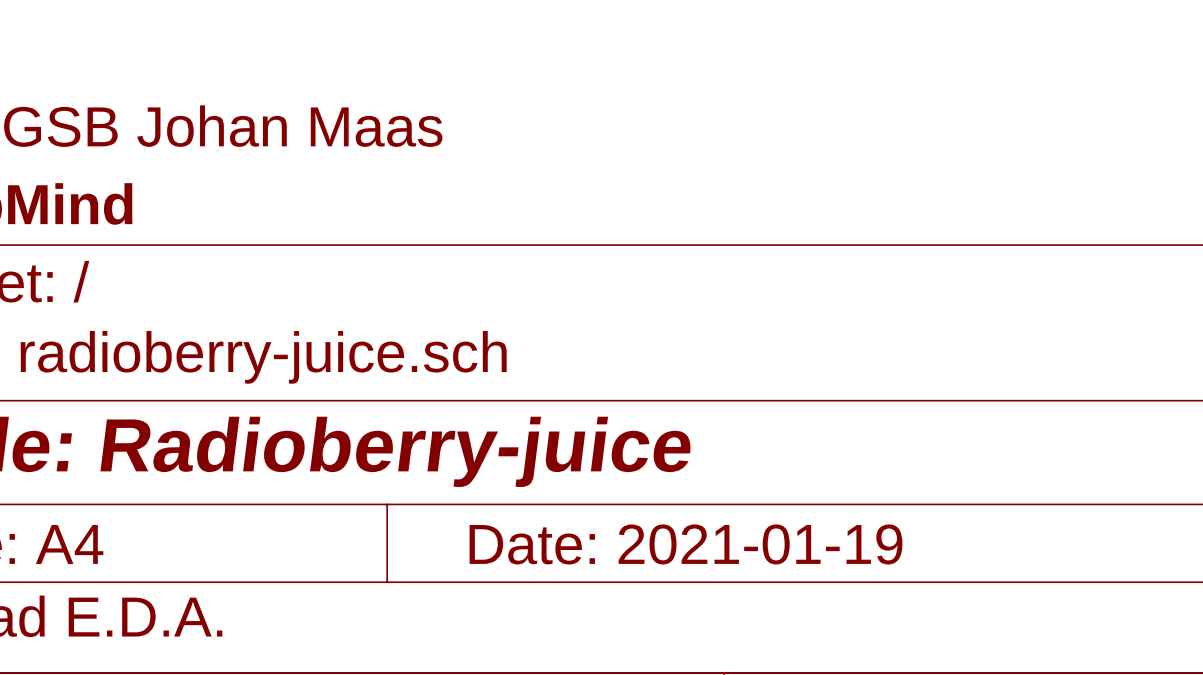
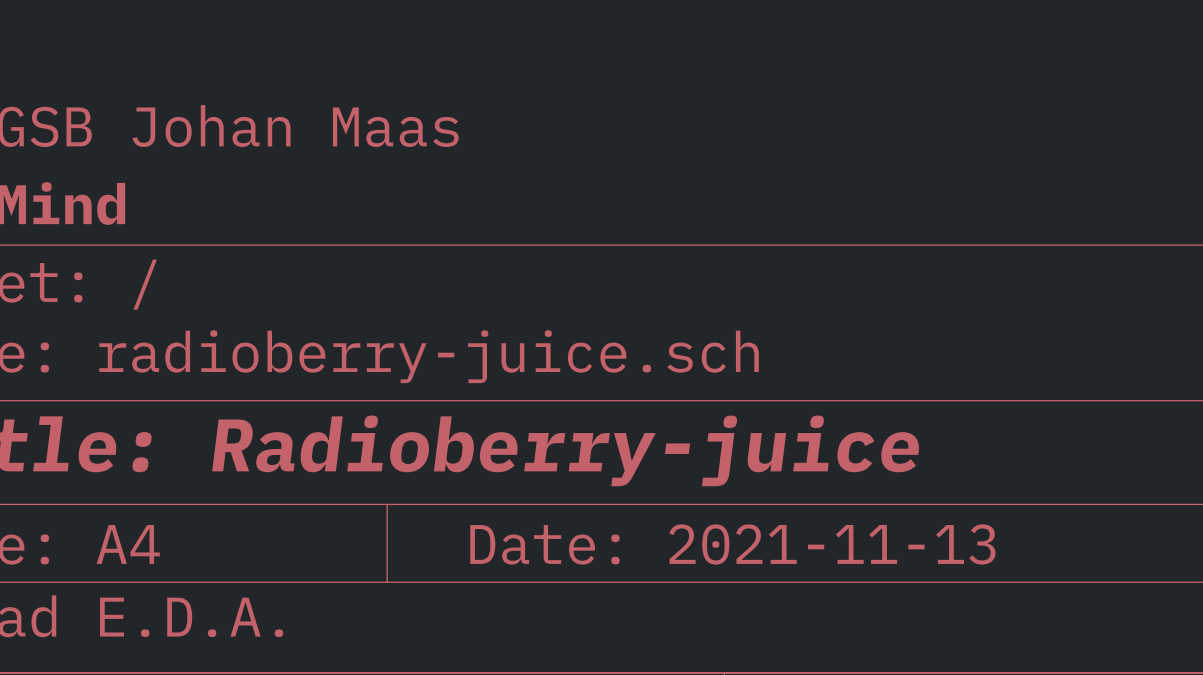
title block: Date: 2021-01-19 (686, 544) -> Date: 2021-11-13 (732, 544)

